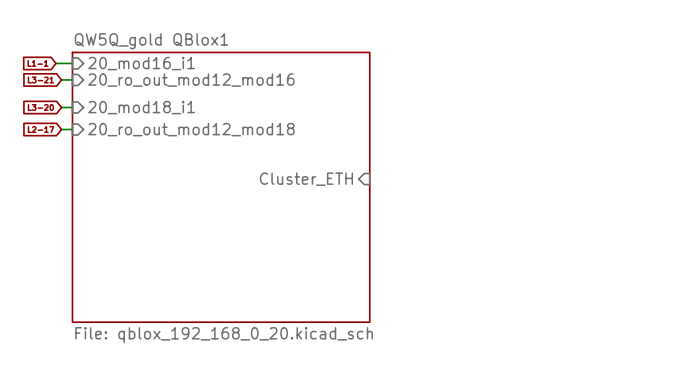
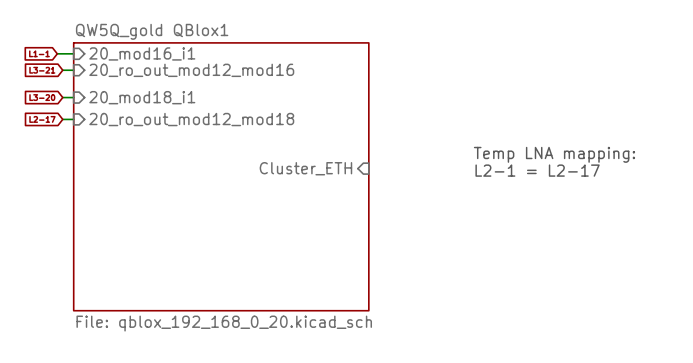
text: none -> Temp LNA mapping: (554, 154)
text: none -> L2-1 = L2-17 (537, 170)

